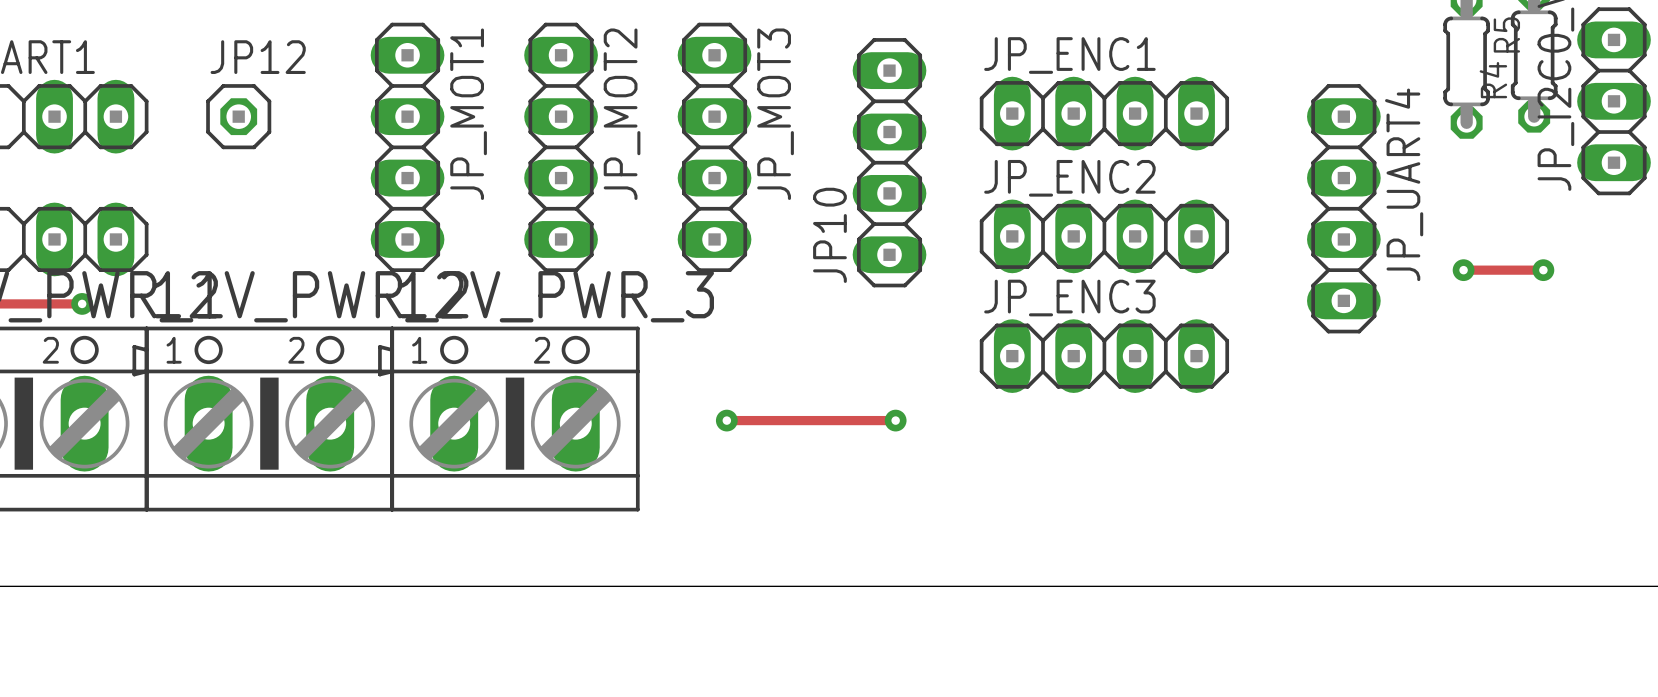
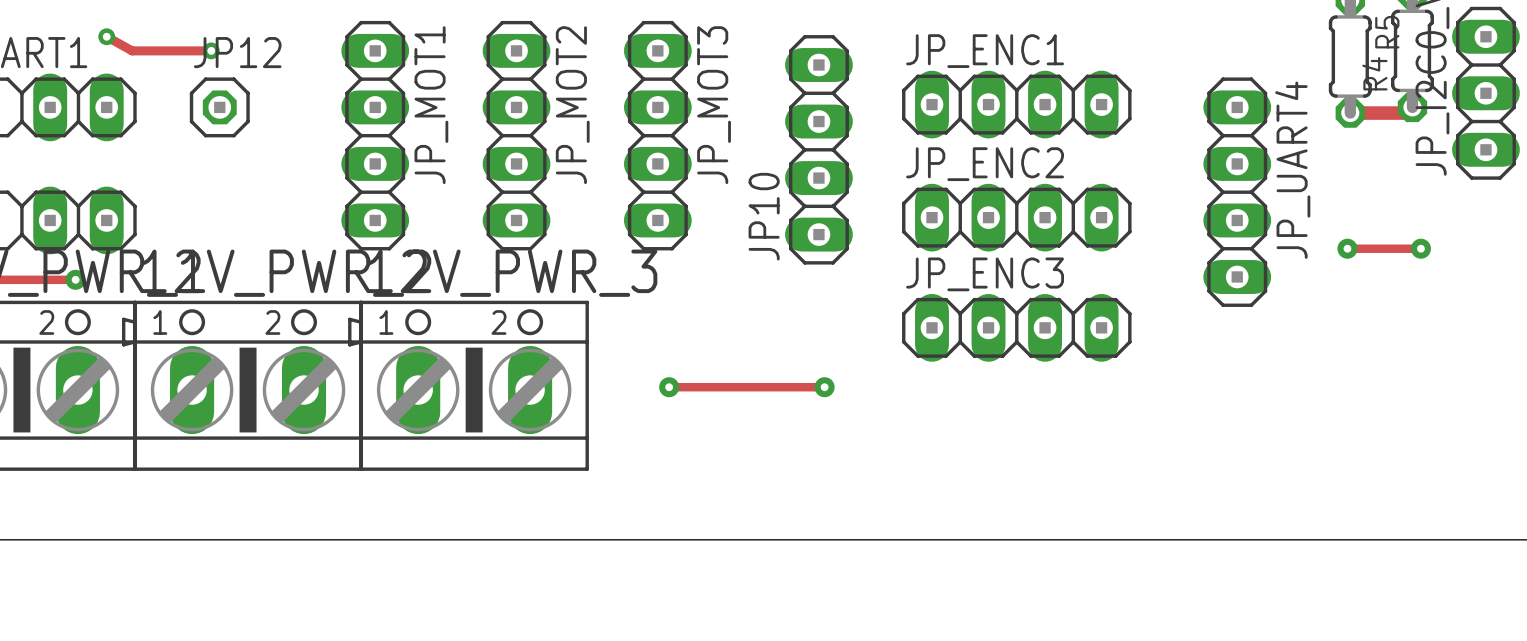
track: none -> (106, 36) (132, 50) (211, 50)
via: none -> (106, 36)
via: none -> (211, 50)
track: none -> (1412, 107) (1406, 113) (1350, 113)

